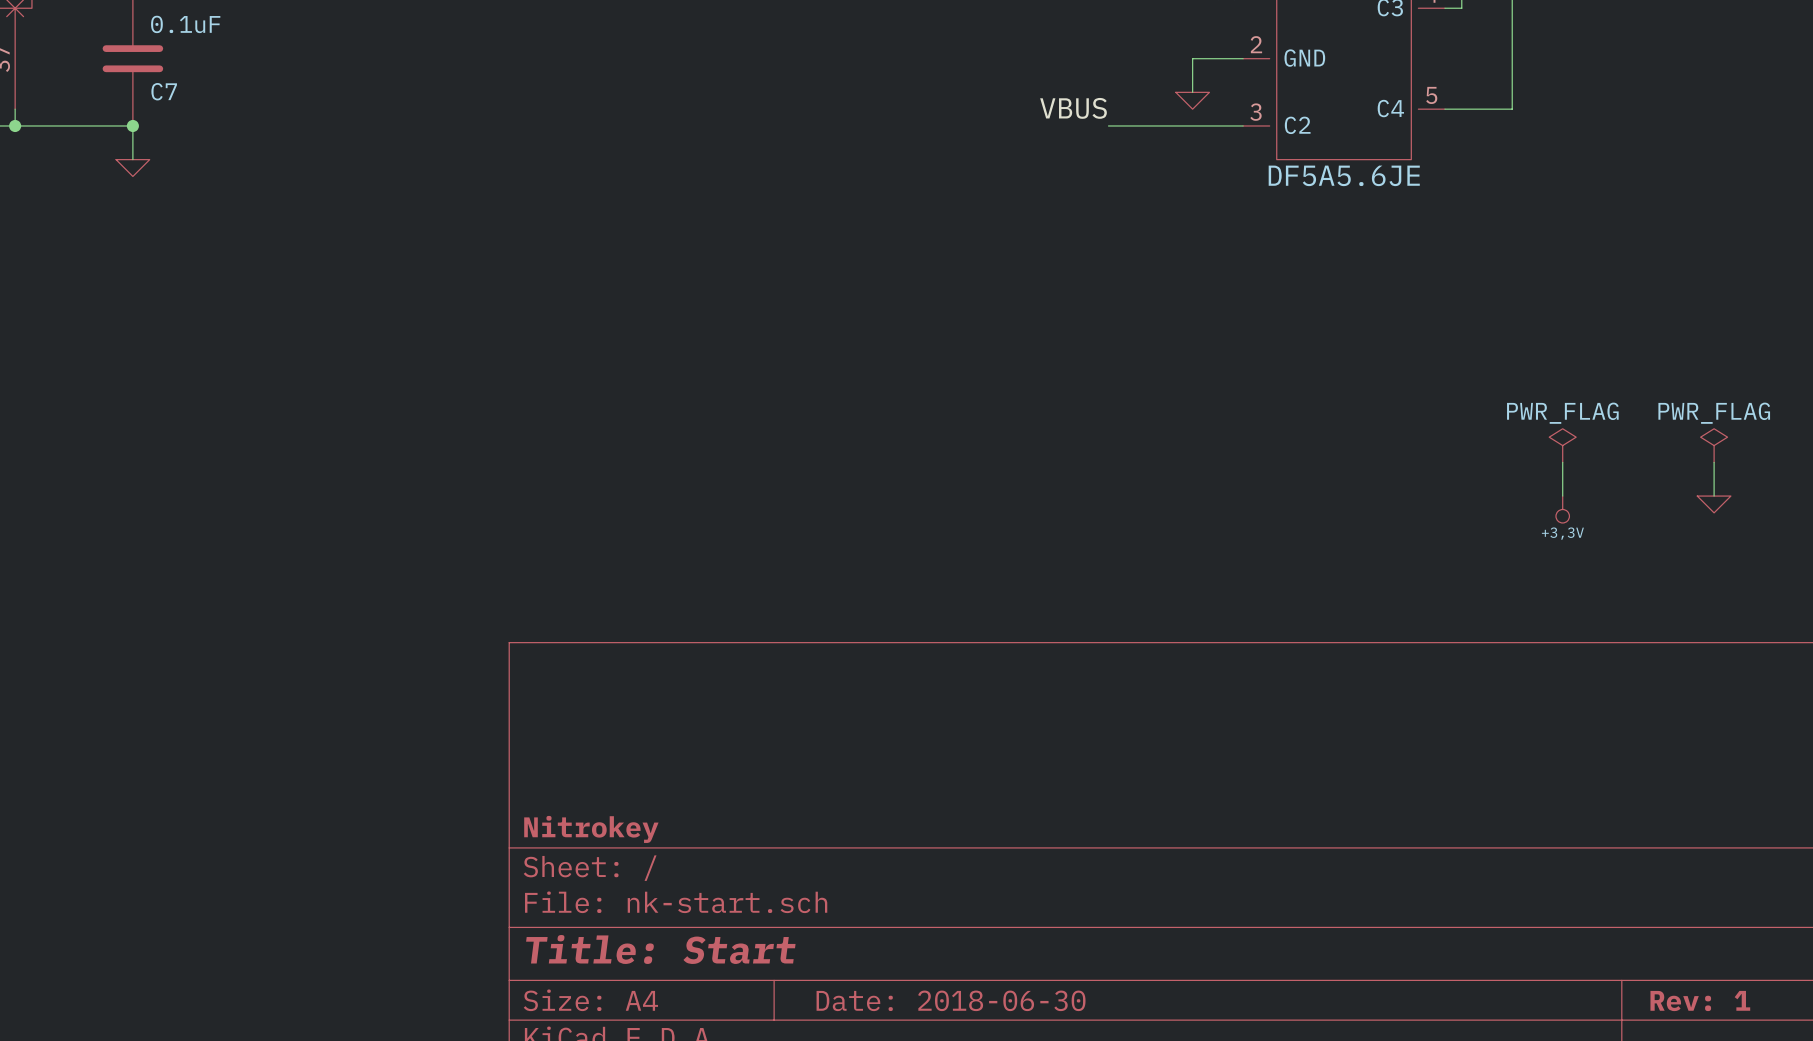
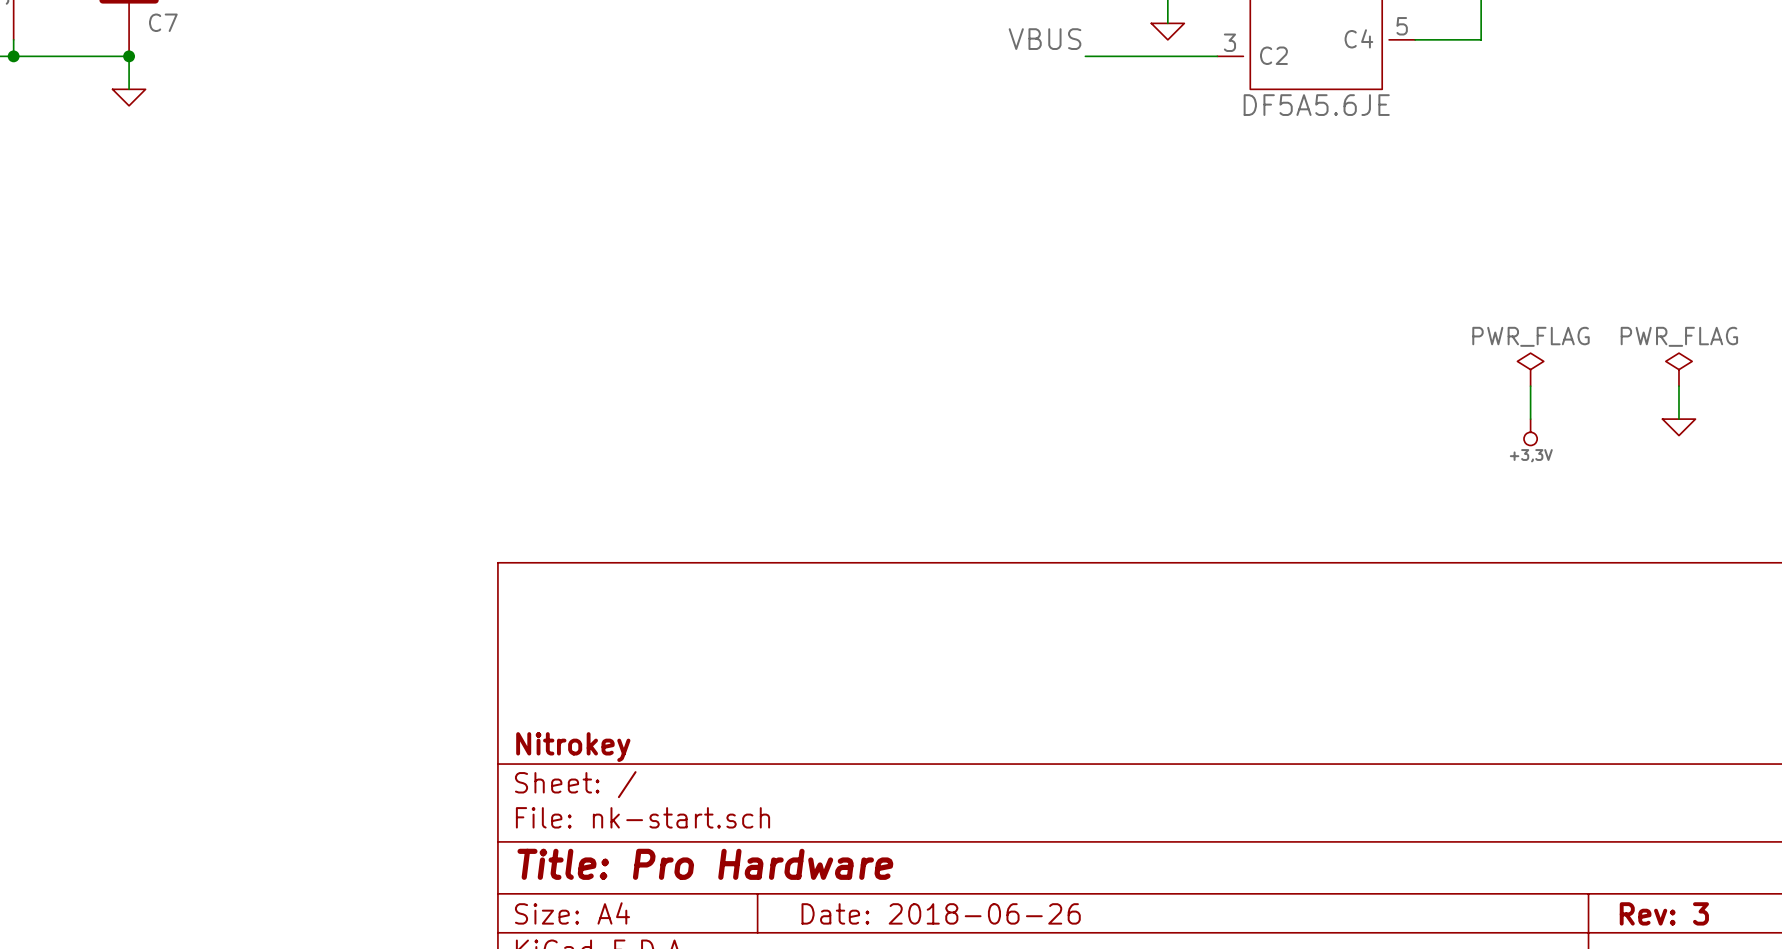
title block: Title: Start (660, 949) -> Title: Pro Hardware (705, 864)
title block: Date: 2018-06-30 (951, 1000) -> Date: 2018-06-26 (941, 913)
title block: Rev: 1 (1700, 1001) -> Rev: 3 (1664, 913)

